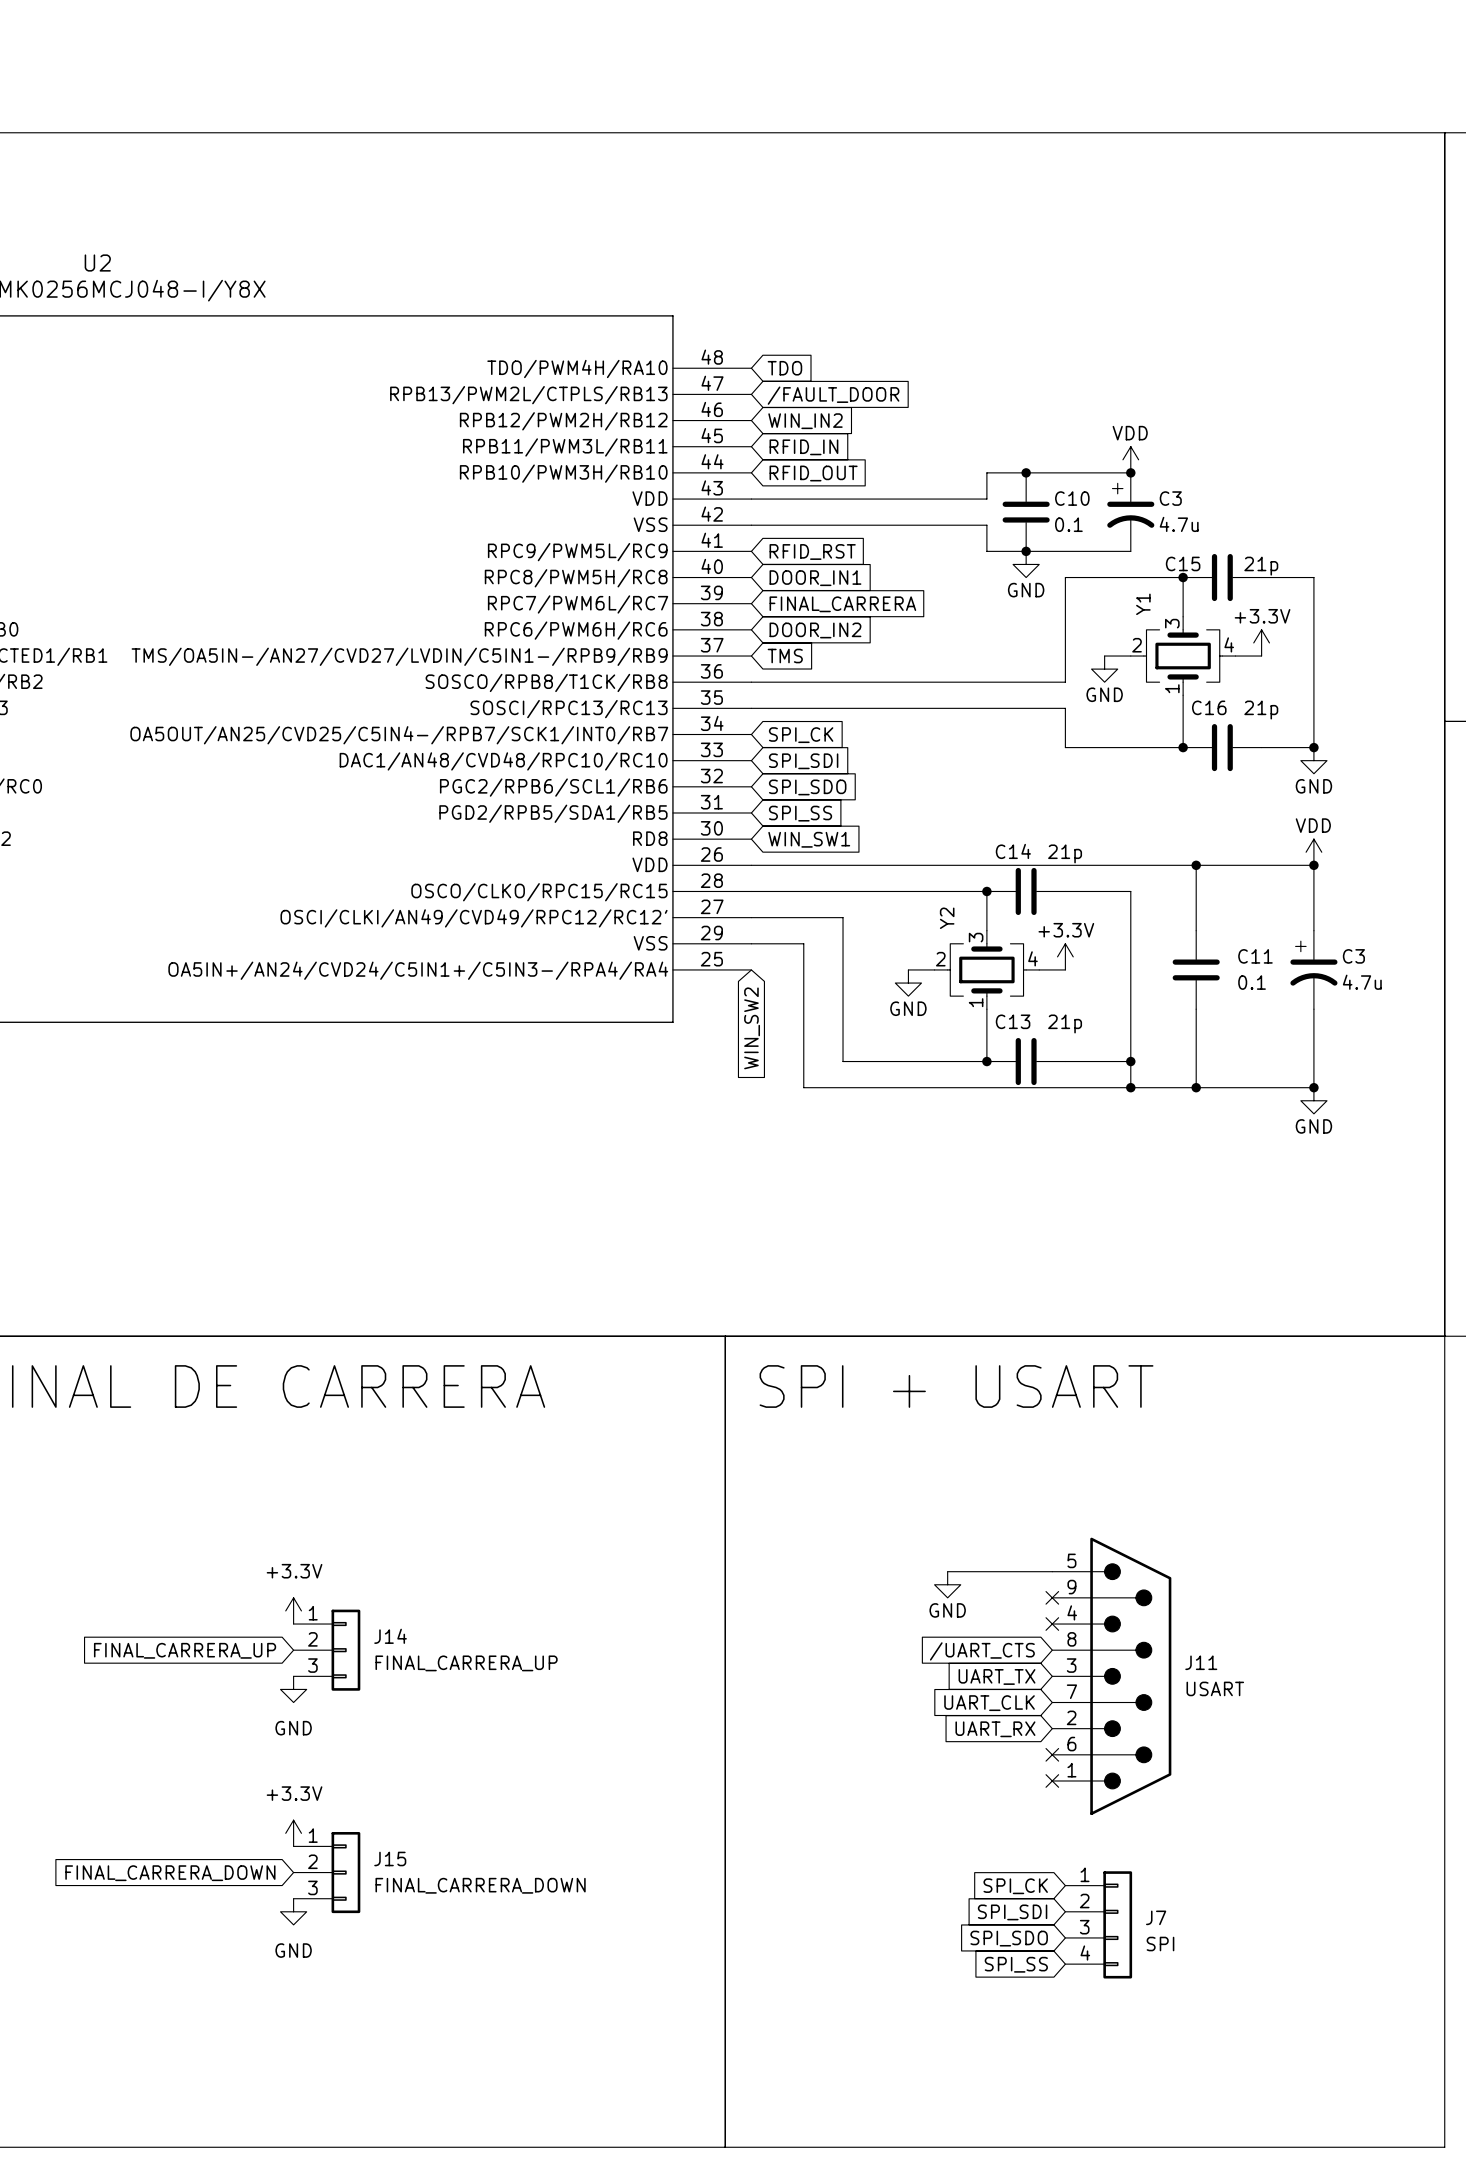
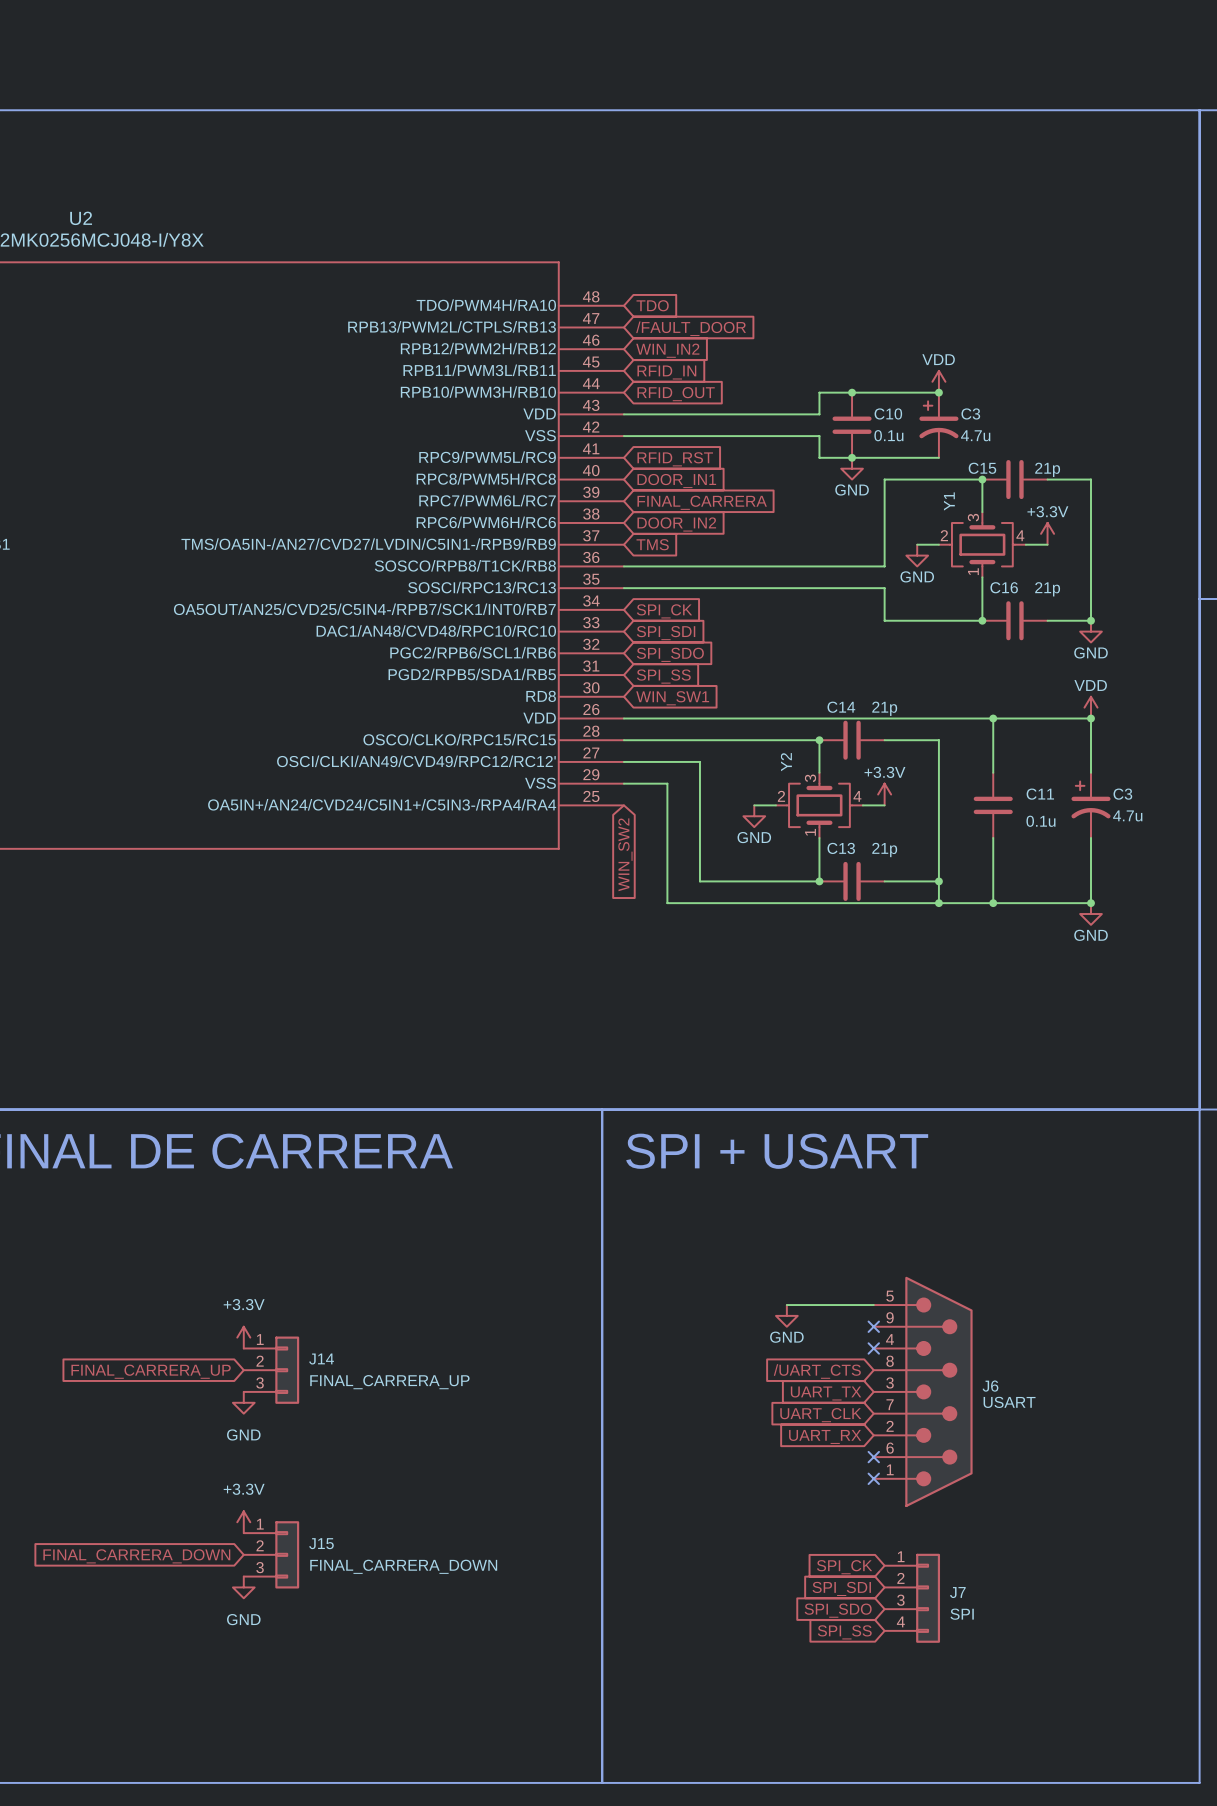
C10 value: 0.1 (1068, 524) -> 0.1u (888, 435)
C11 value: 0.1 (1252, 982) -> 0.1u (1040, 821)
J11 name: J11 (1201, 1662) -> J6 (990, 1386)

